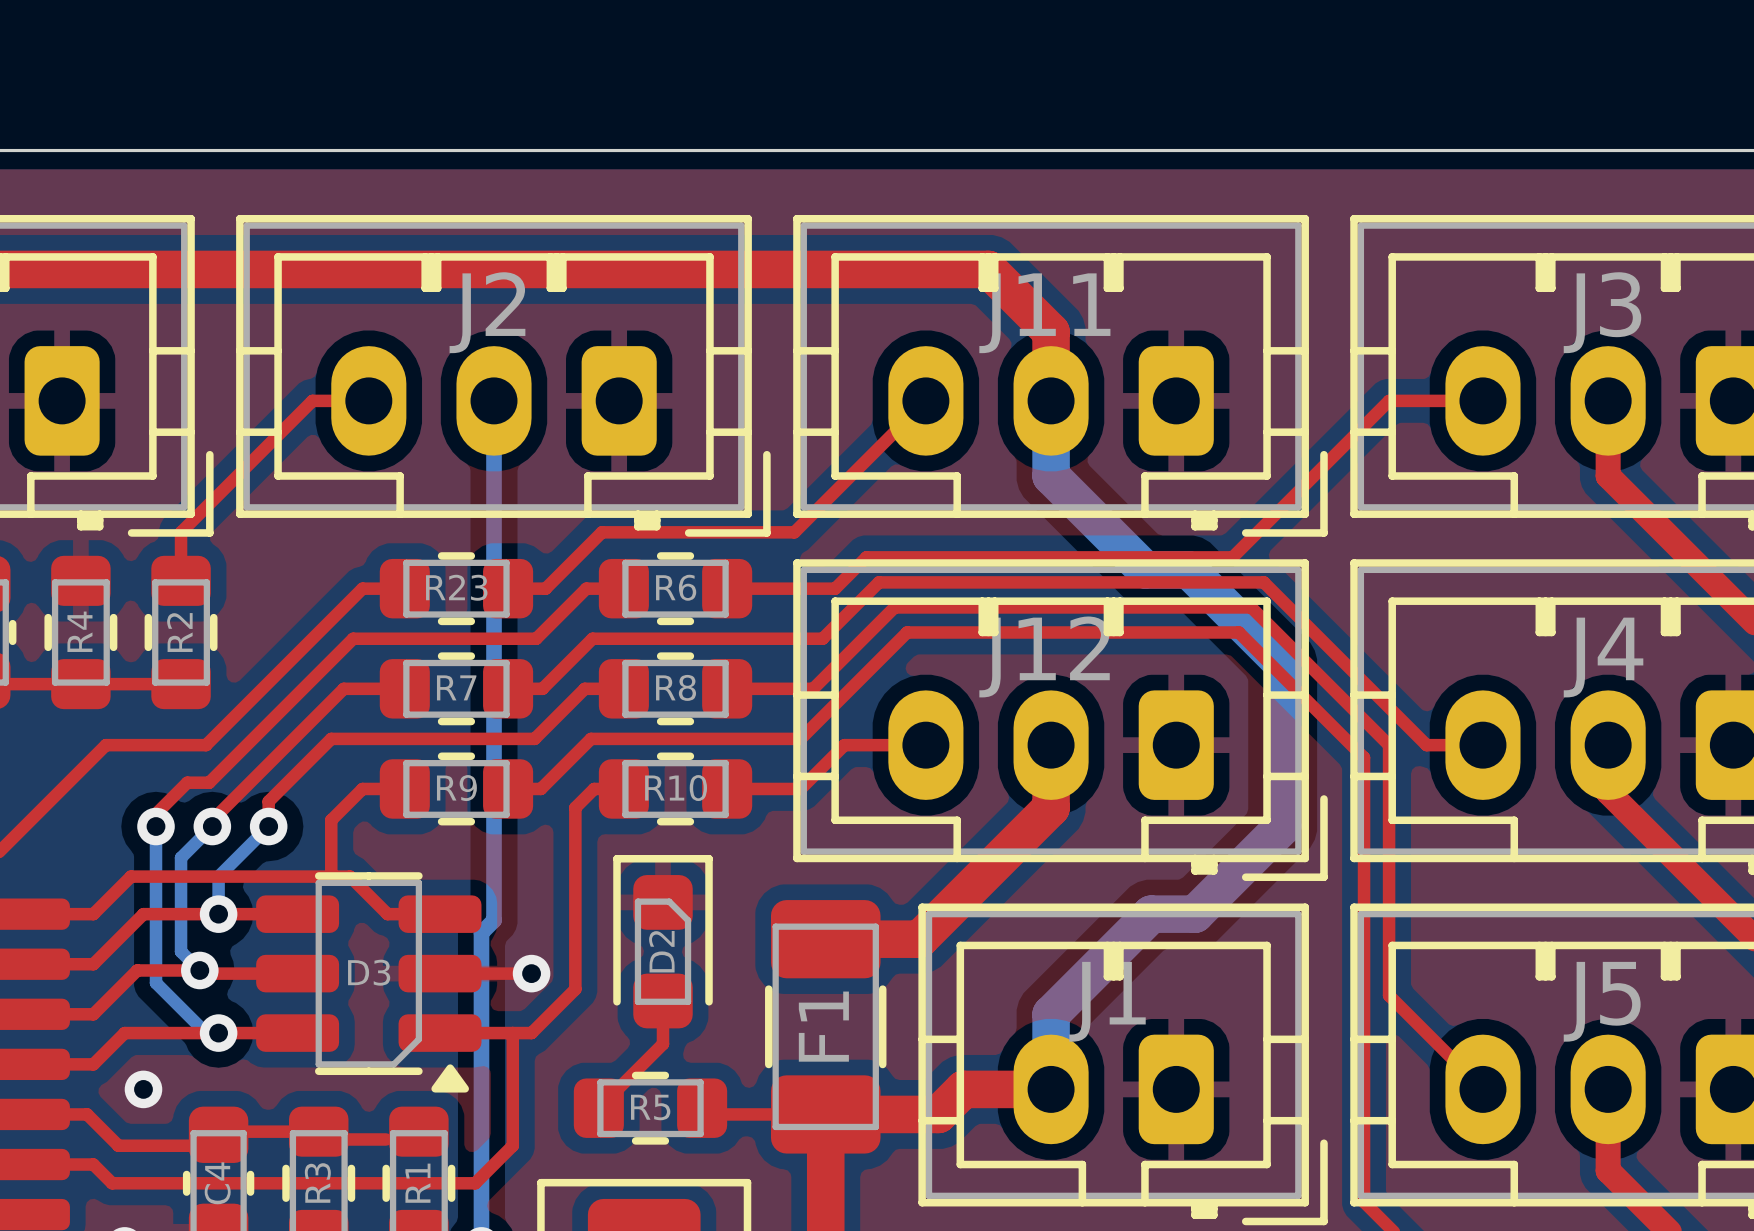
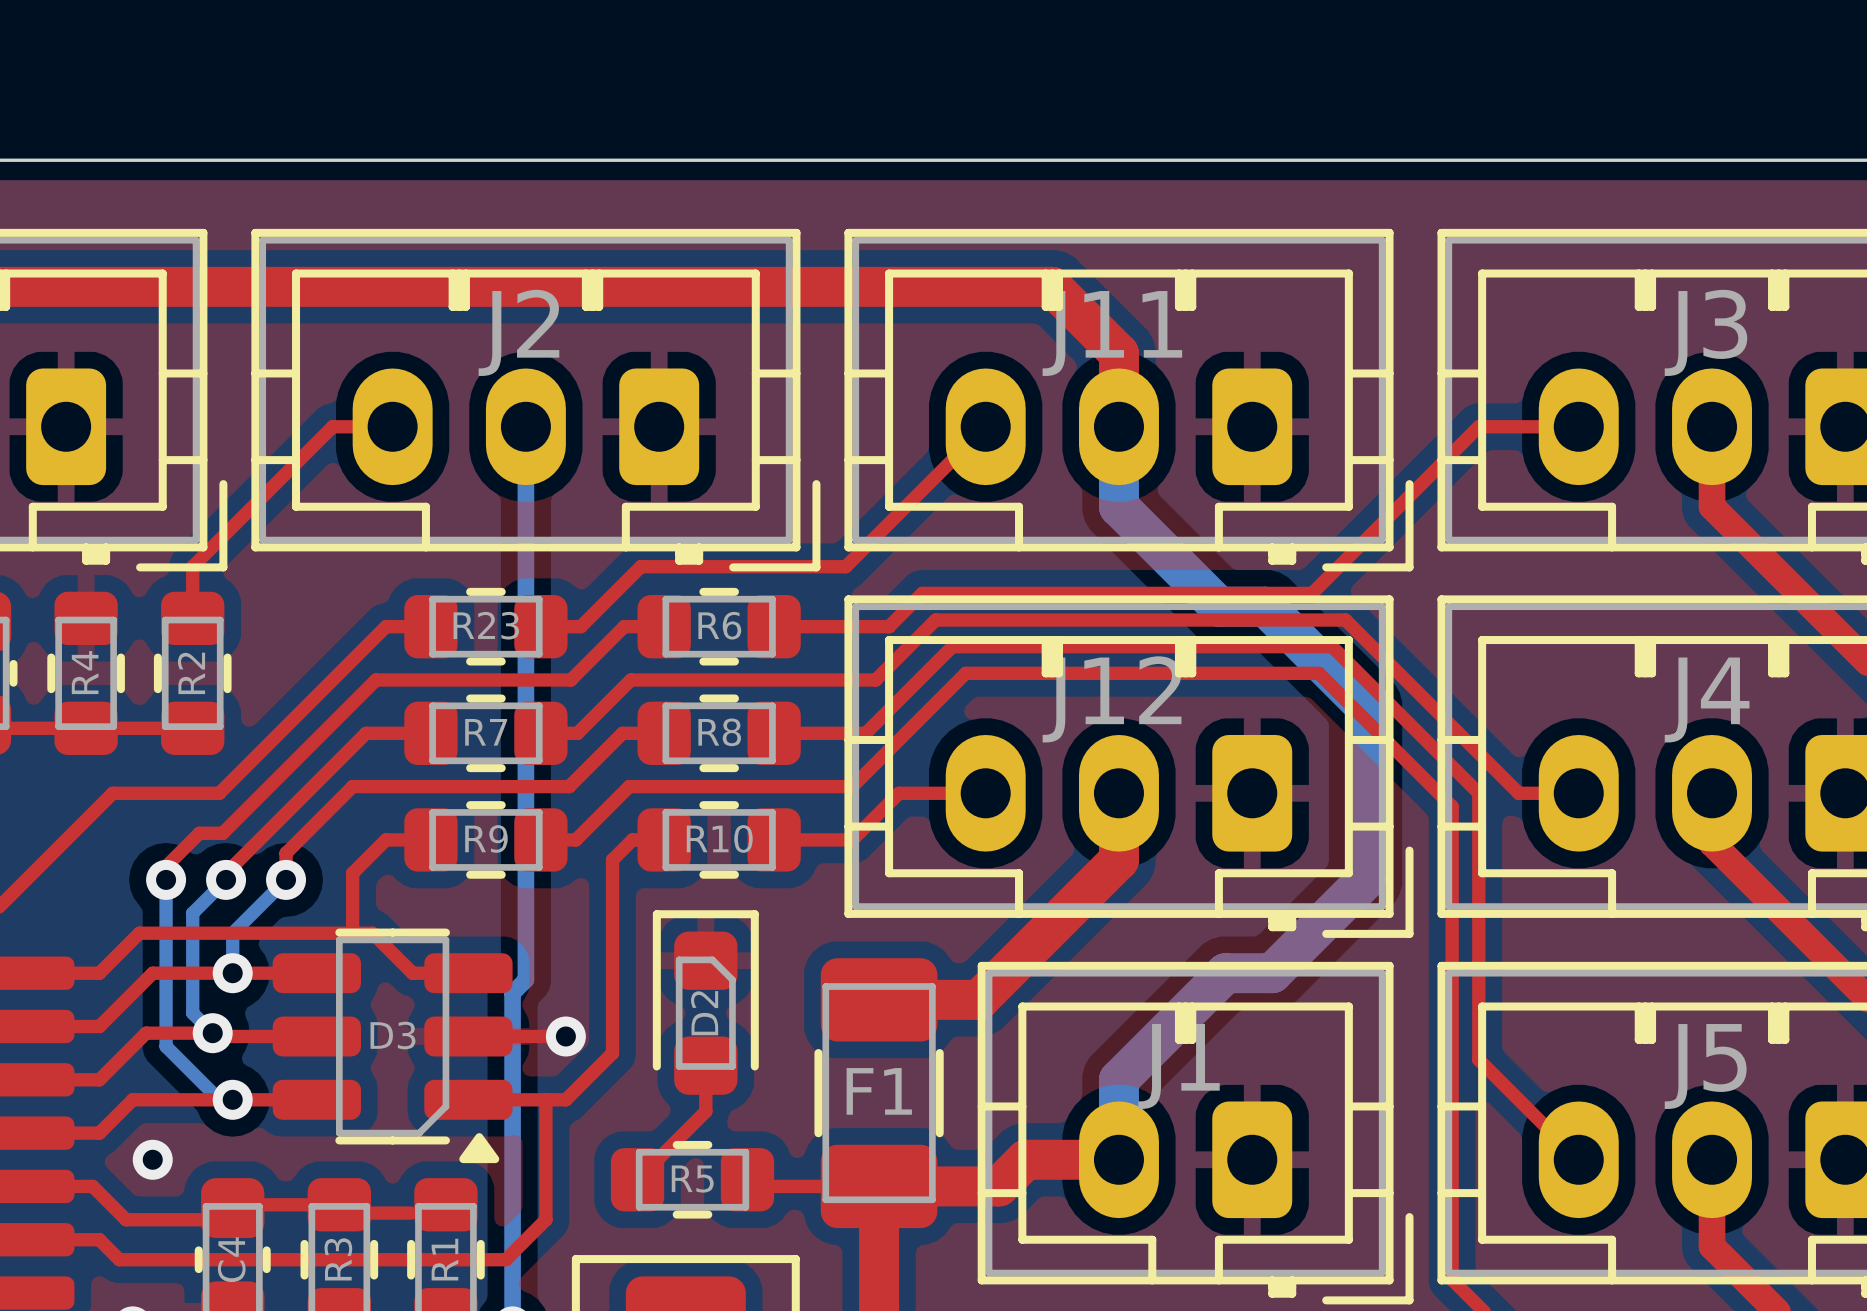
F1 name rotation: 0° (823, 1026) -> 90° clockwise (879, 1091)

